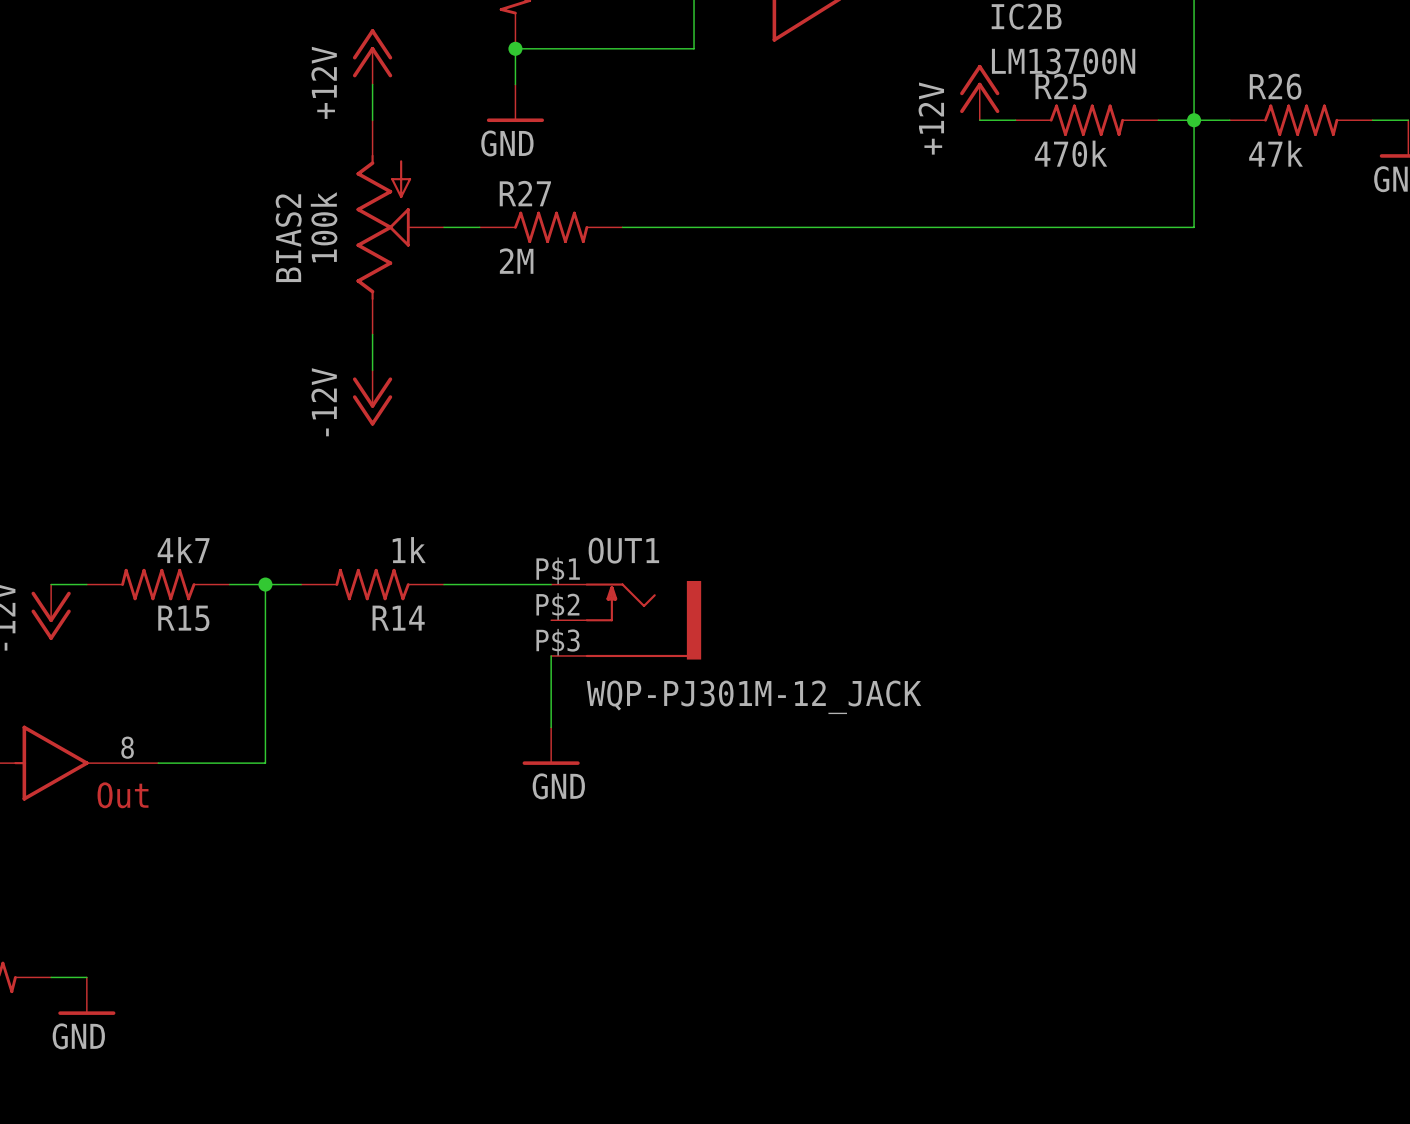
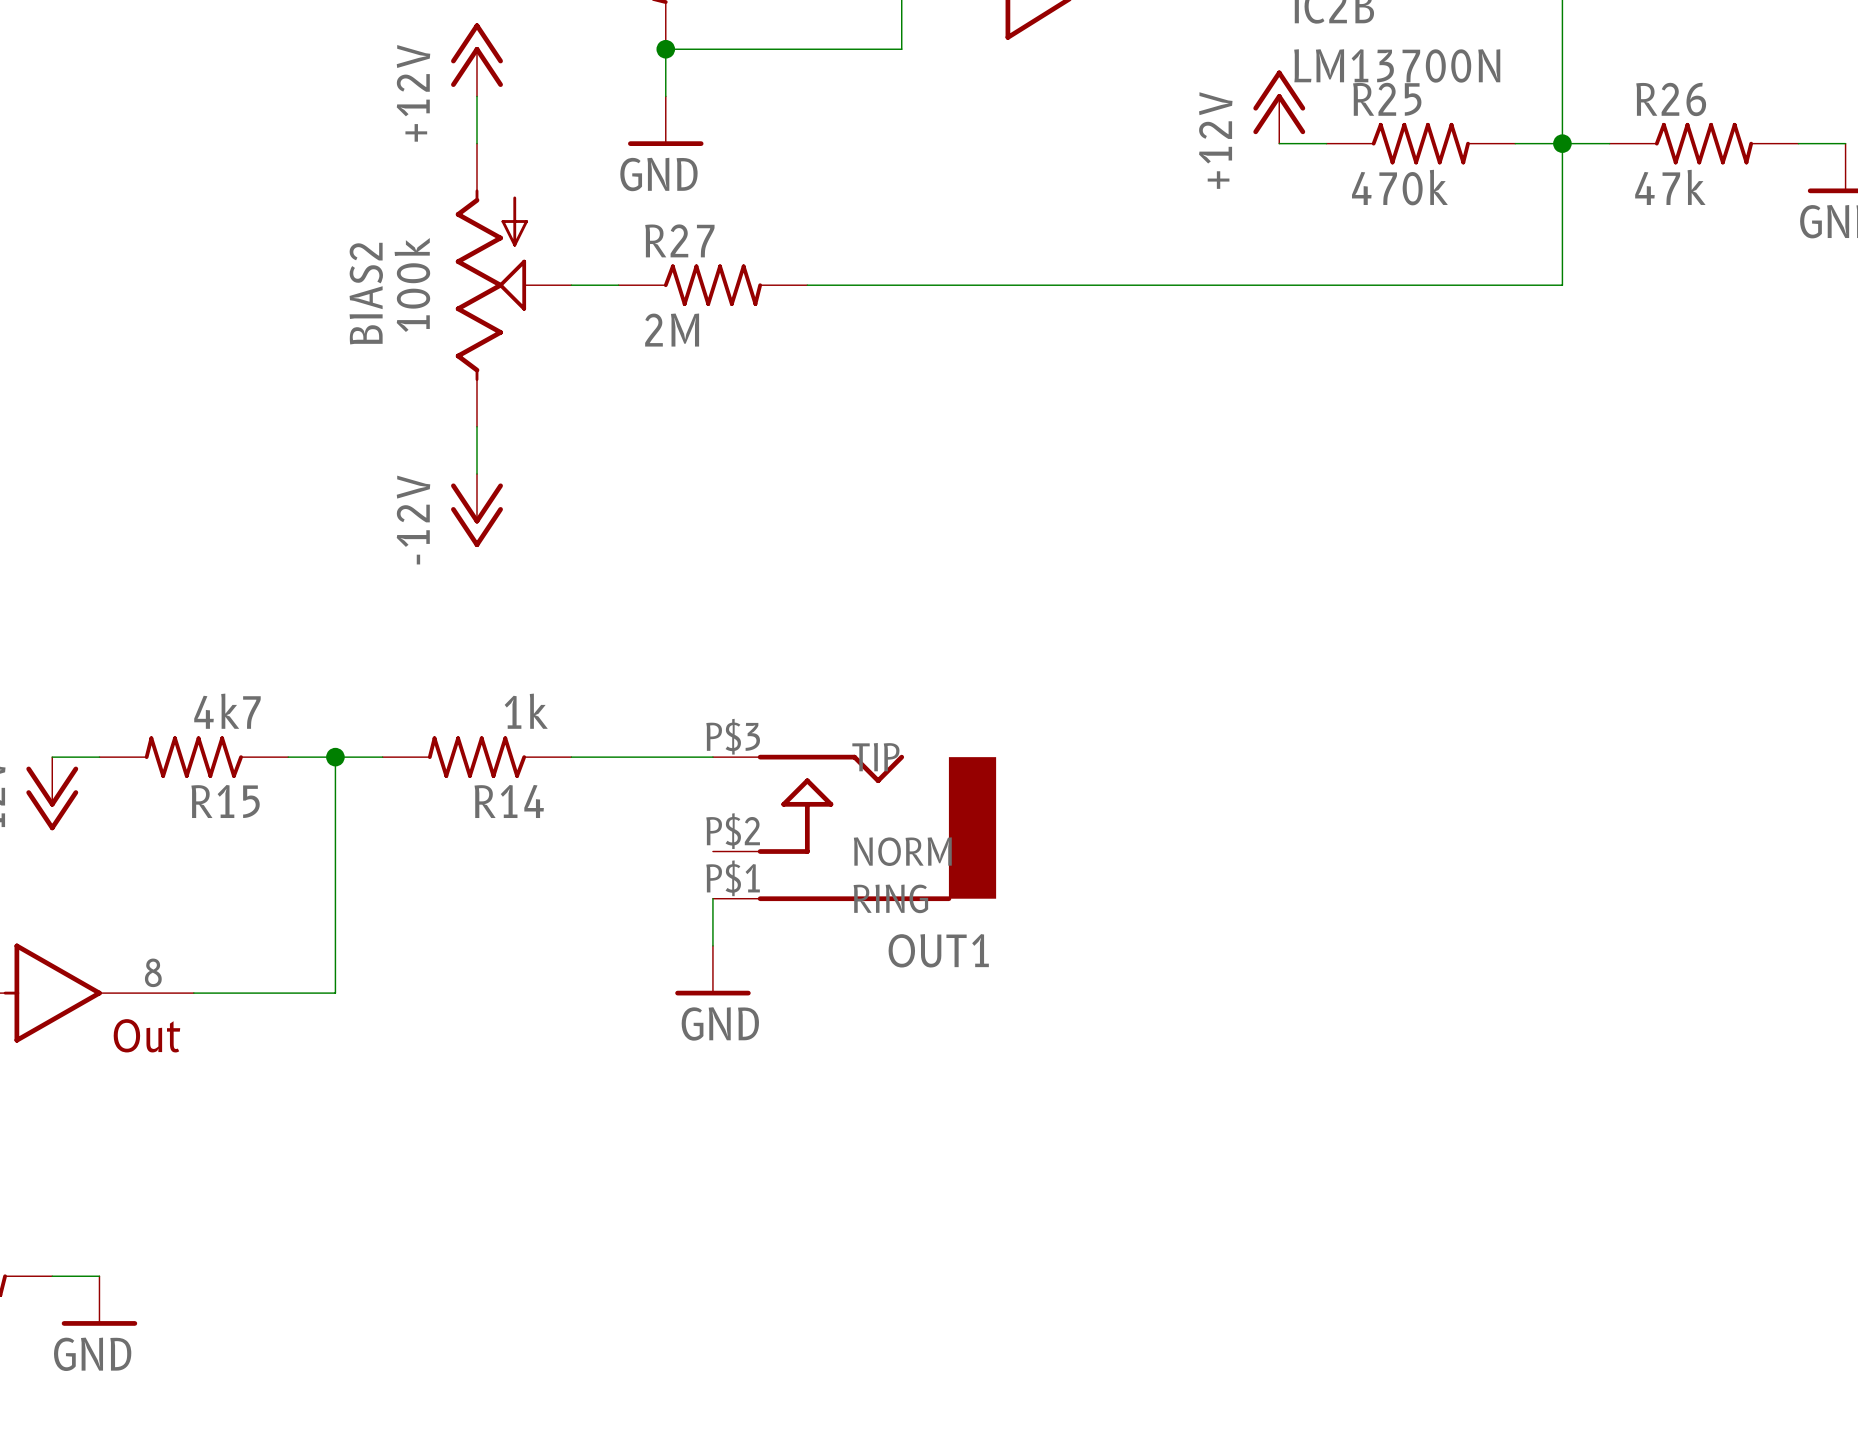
OUT1 name position: OUT1 (623, 550) -> OUT1 (938, 950)
OUT1 symbol: [551, 580, 702, 660] -> [712, 754, 997, 902]
wire: (551, 655) (551, 691) -> none
OUT1 value: WQP-PJ301M-12_JACK (754, 697) -> none

